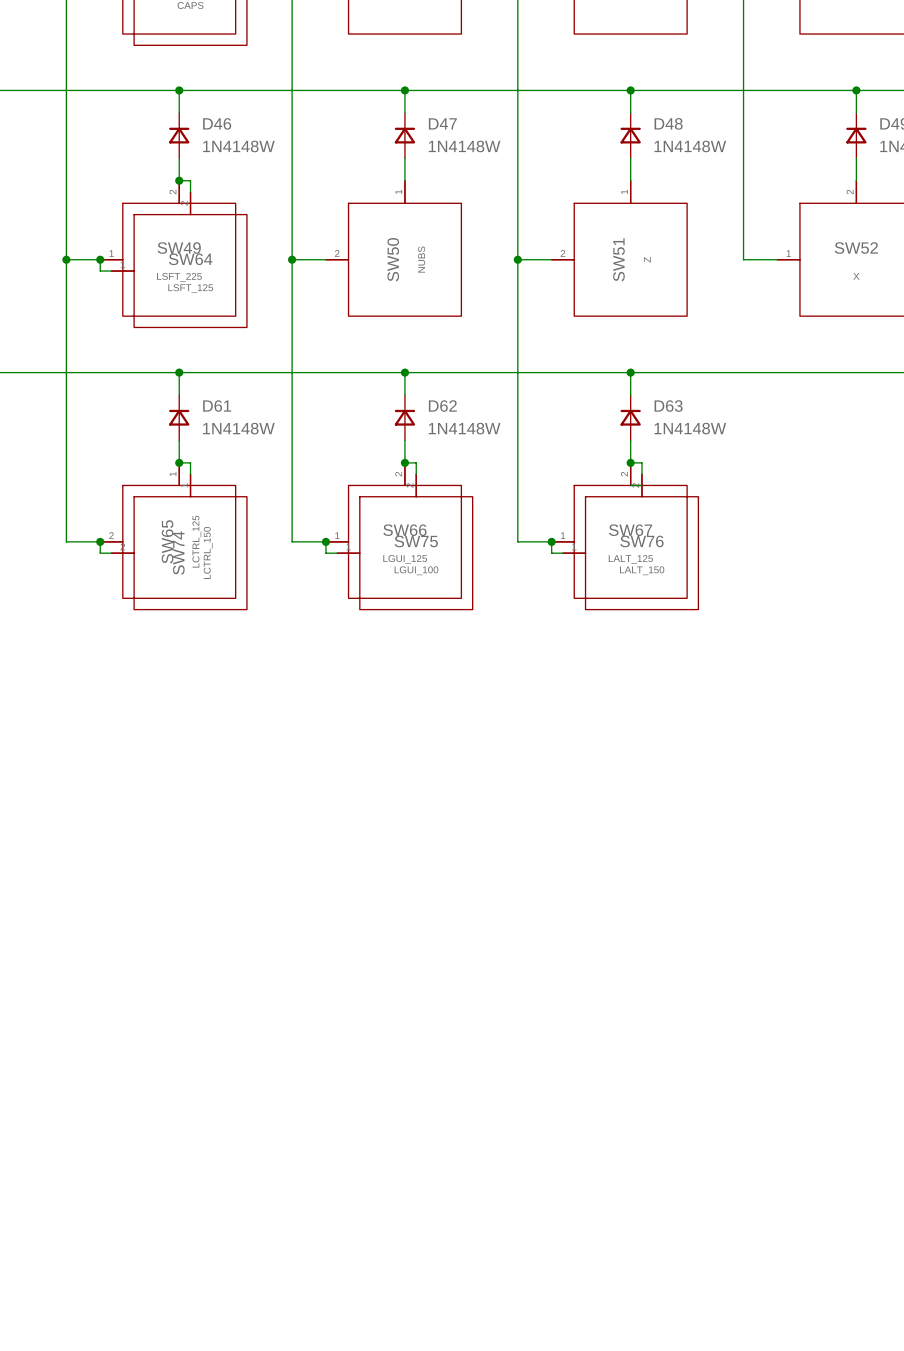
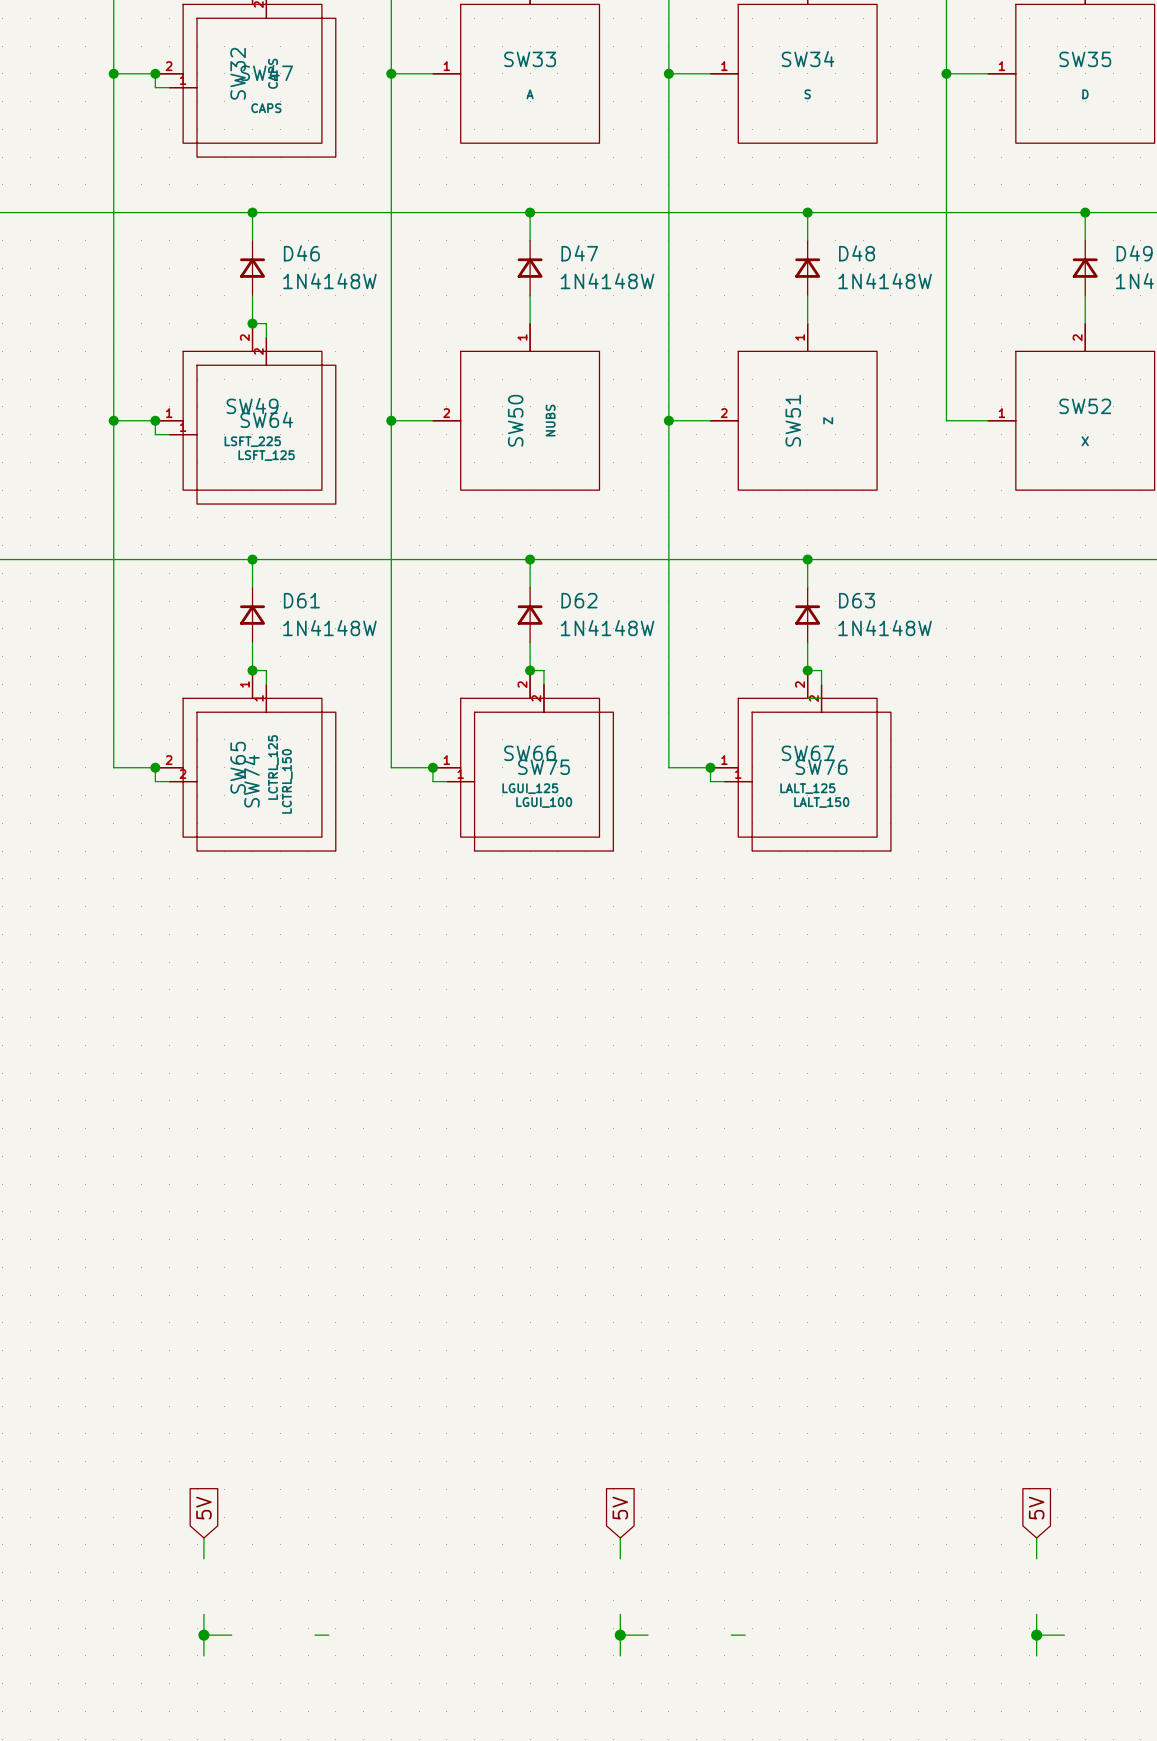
global label: none -> 5V (203, 1508)
global label: none -> 5V (620, 1508)
global label: none -> 5V (1036, 1508)
wire: none -> (203, 1537) (203, 1558)
wire: none -> (620, 1537) (620, 1558)
wire: none -> (1036, 1537) (1036, 1558)
wire: none -> (203, 1614) (203, 1655)
wire: none -> (620, 1614) (620, 1655)
wire: none -> (1036, 1614) (1036, 1655)
wire: none -> (203, 1635) (231, 1635)
junction: none -> (203, 1635)
wire: none -> (314, 1635) (328, 1635)
wire: none -> (620, 1635) (648, 1635)
junction: none -> (620, 1635)
wire: none -> (731, 1635) (745, 1635)
wire: none -> (1036, 1635) (1064, 1635)
junction: none -> (1036, 1635)

